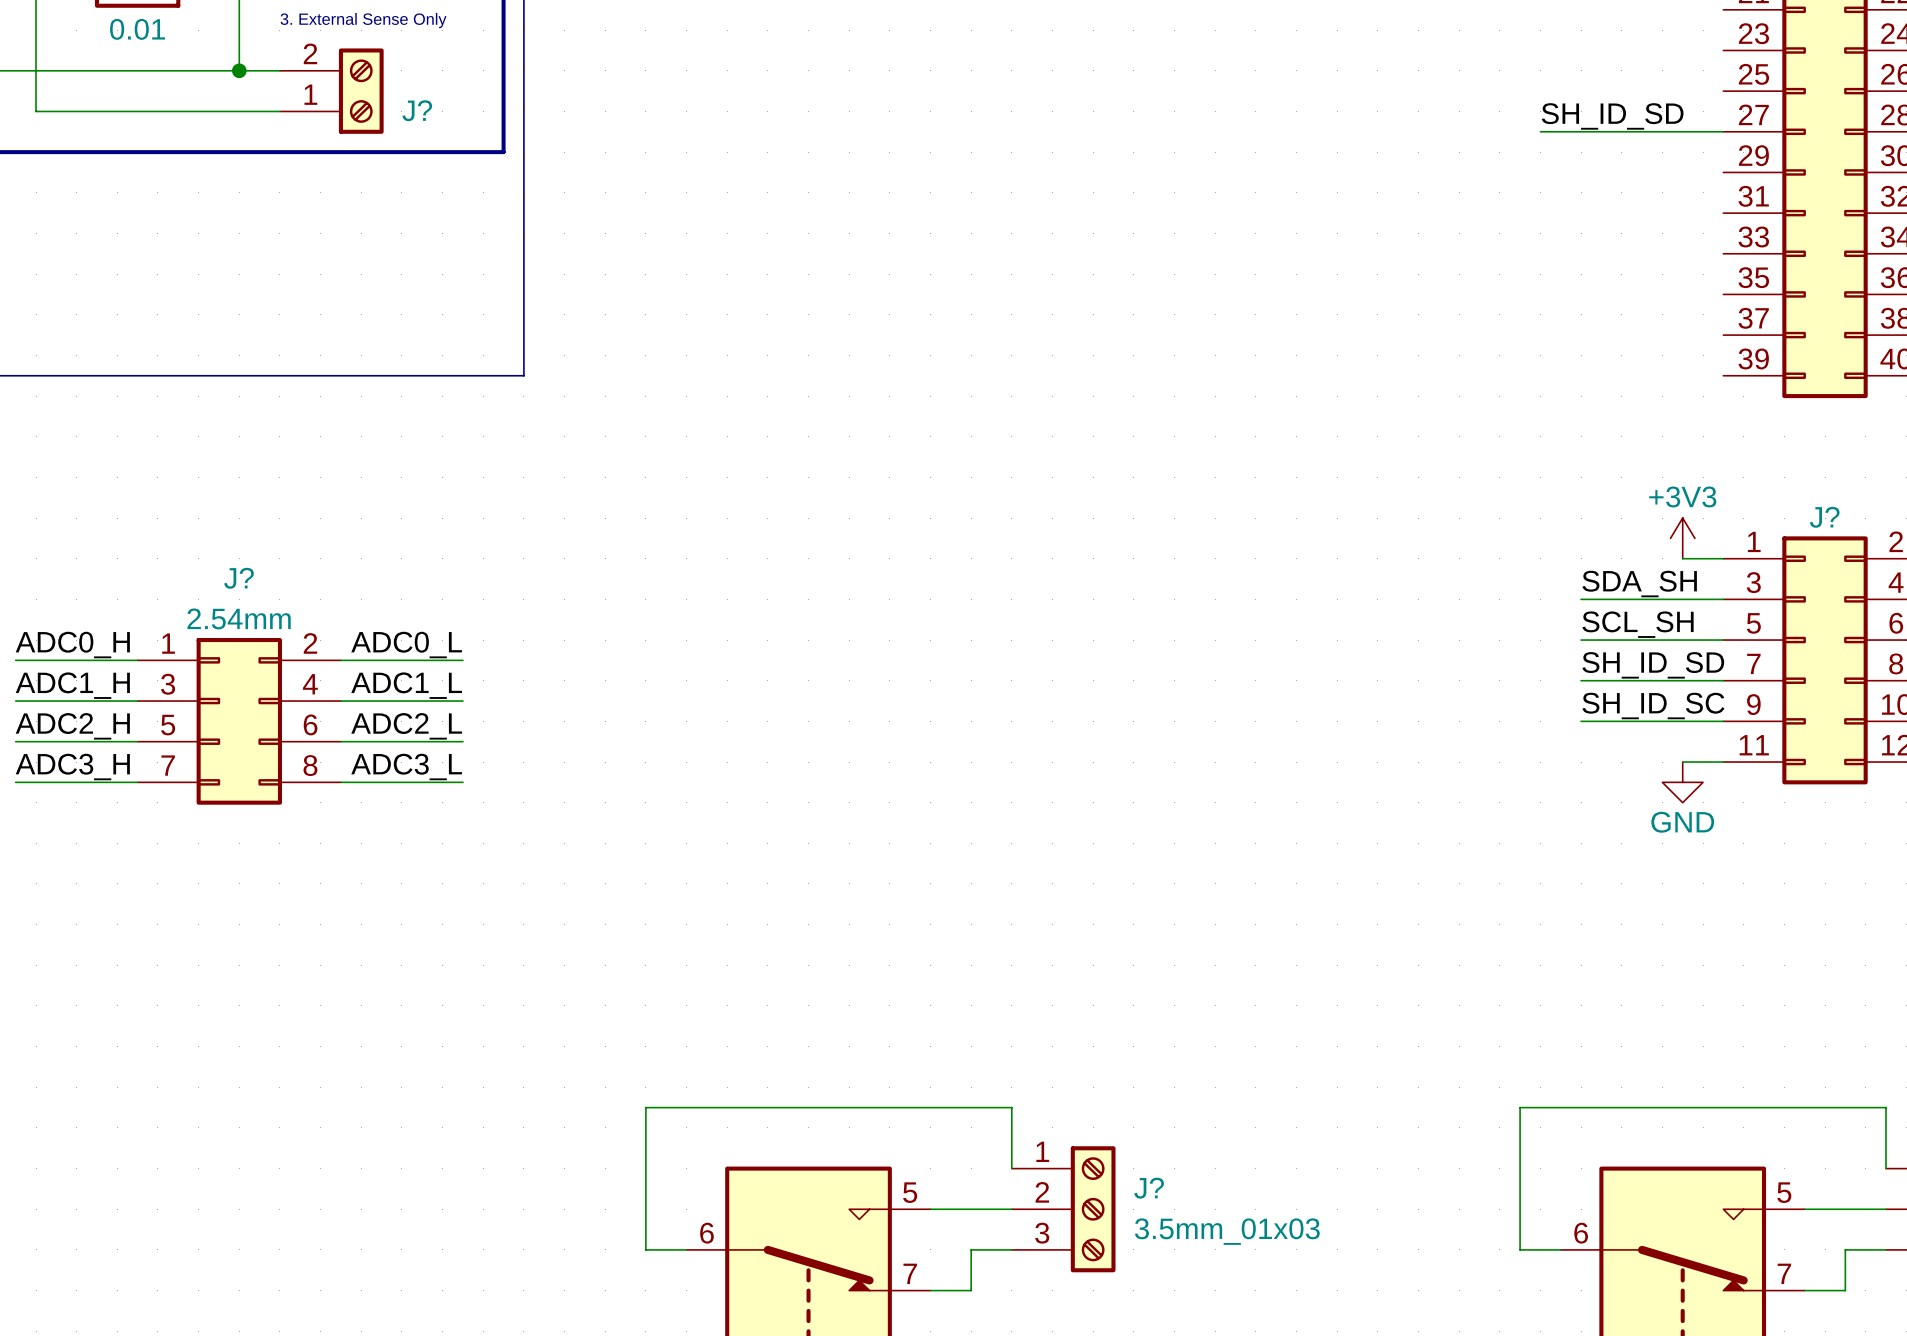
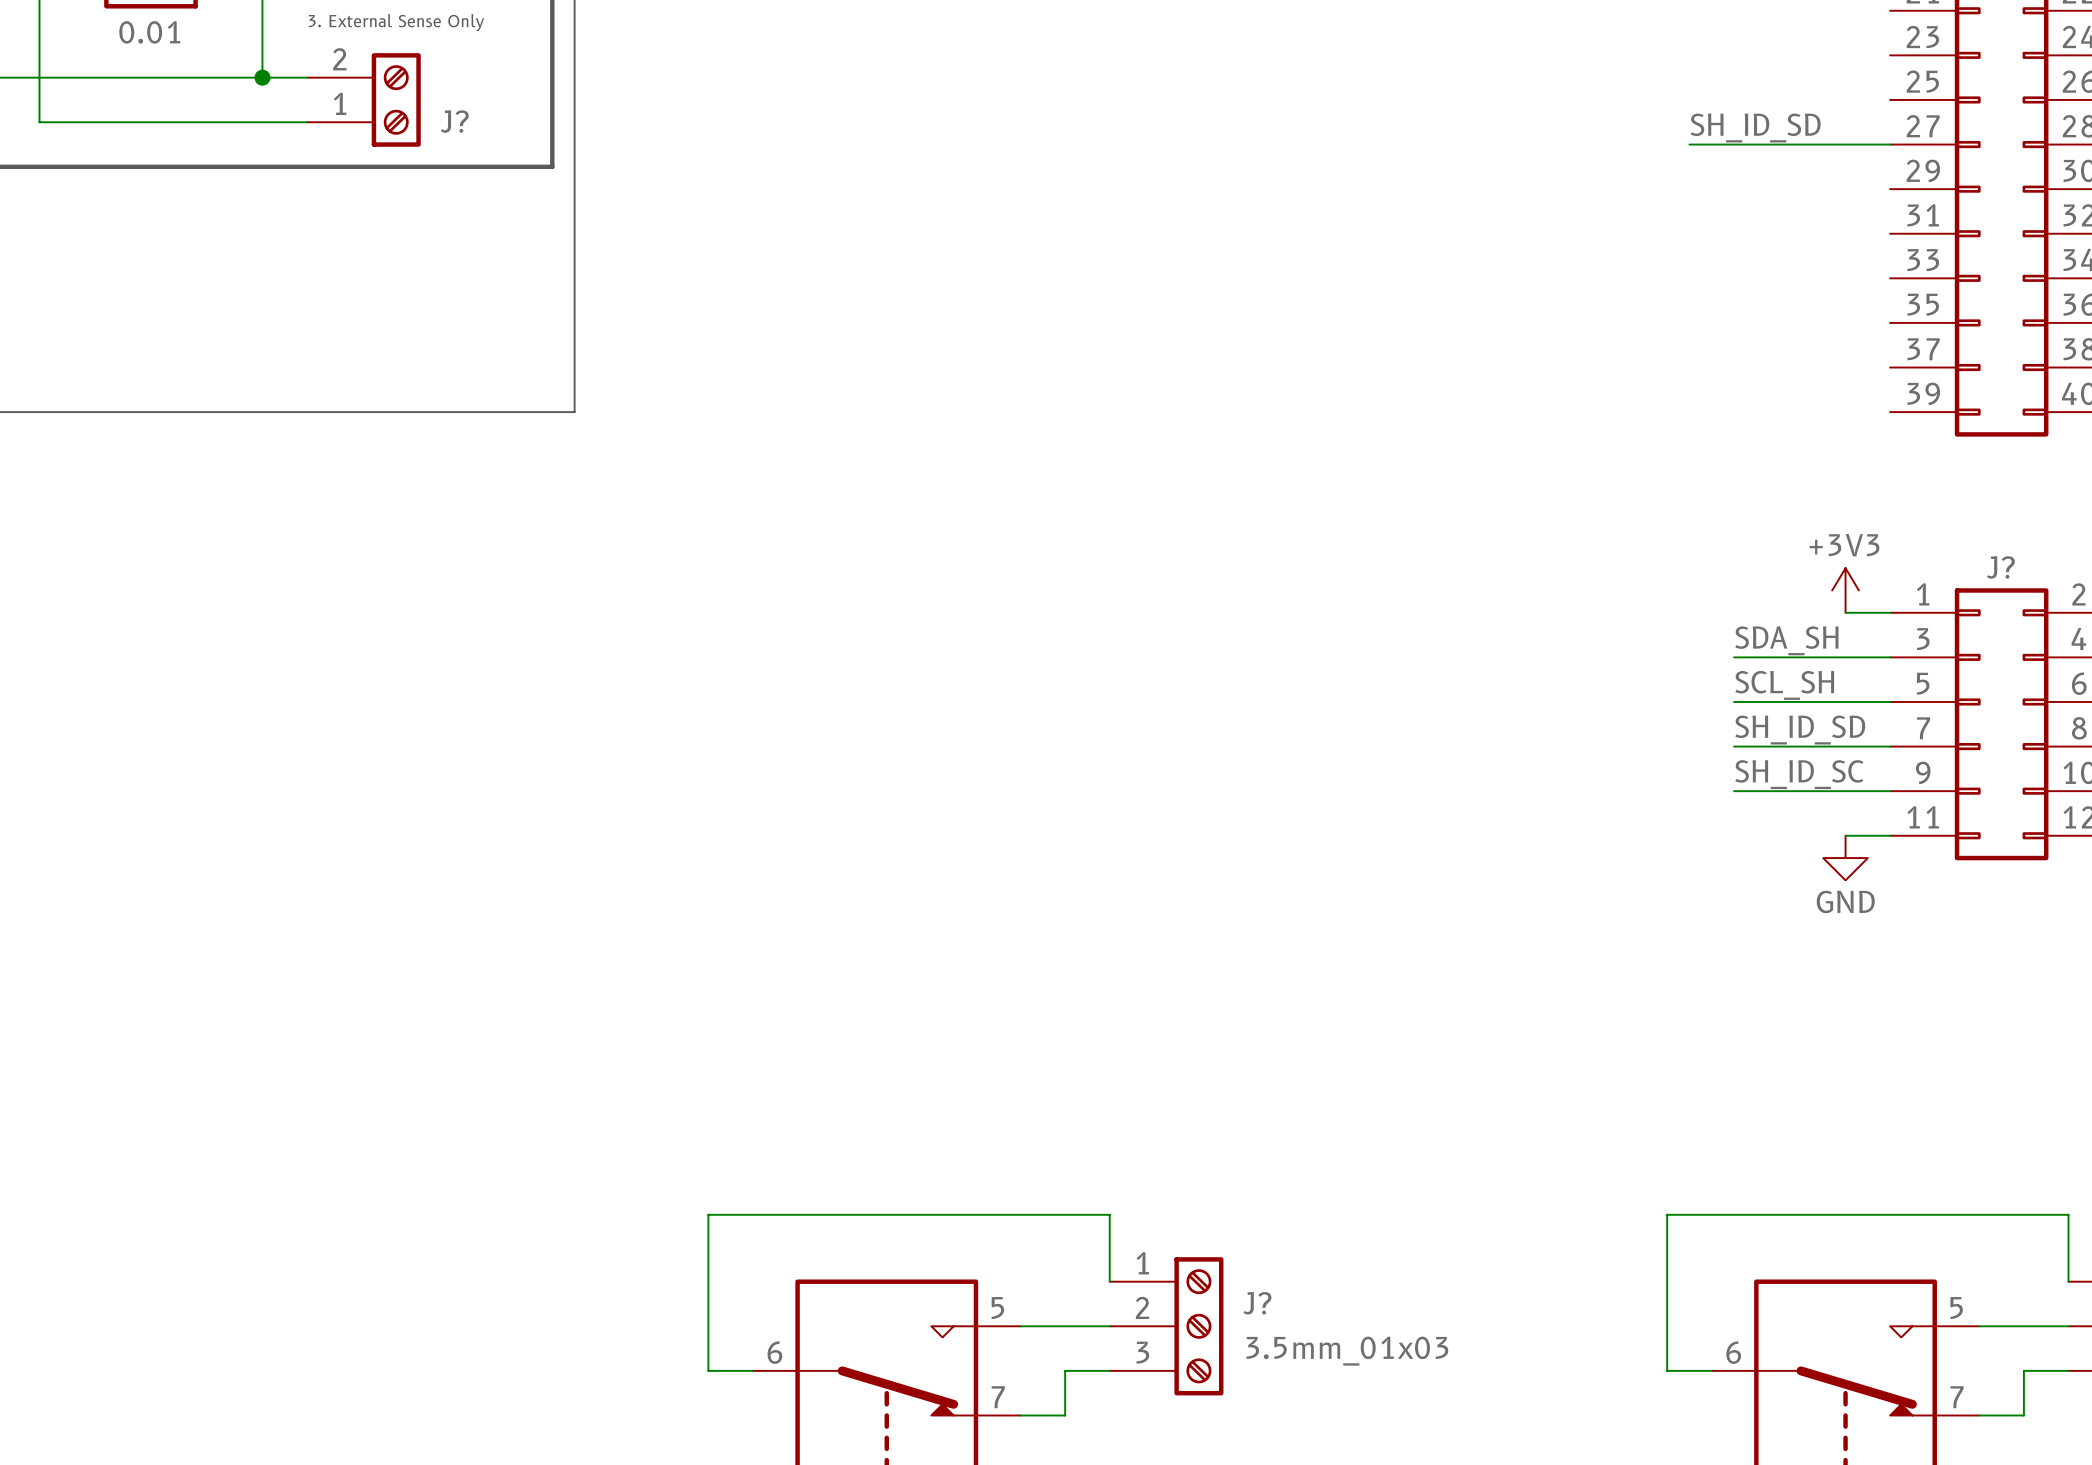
label: ADC0_H (72, 645) -> none
label: ADC0_L (406, 645) -> none
wire: (15, 660) (137, 660) -> none
wire: (340, 660) (462, 660) -> none
label: ADC1_H (72, 685) -> none
label: ADC1_L (406, 685) -> none
wire: (15, 701) (137, 701) -> none
wire: (340, 701) (462, 701) -> none
J?: 2.54mm (239, 721) -> none
label: ADC2_H (72, 726) -> none
label: ADC2_L (406, 726) -> none
wire: (15, 741) (137, 741) -> none
wire: (340, 741) (462, 741) -> none
label: ADC3_H (72, 766) -> none
label: ADC3_L (406, 766) -> none
wire: (15, 782) (137, 782) -> none
wire: (340, 782) (462, 782) -> none

